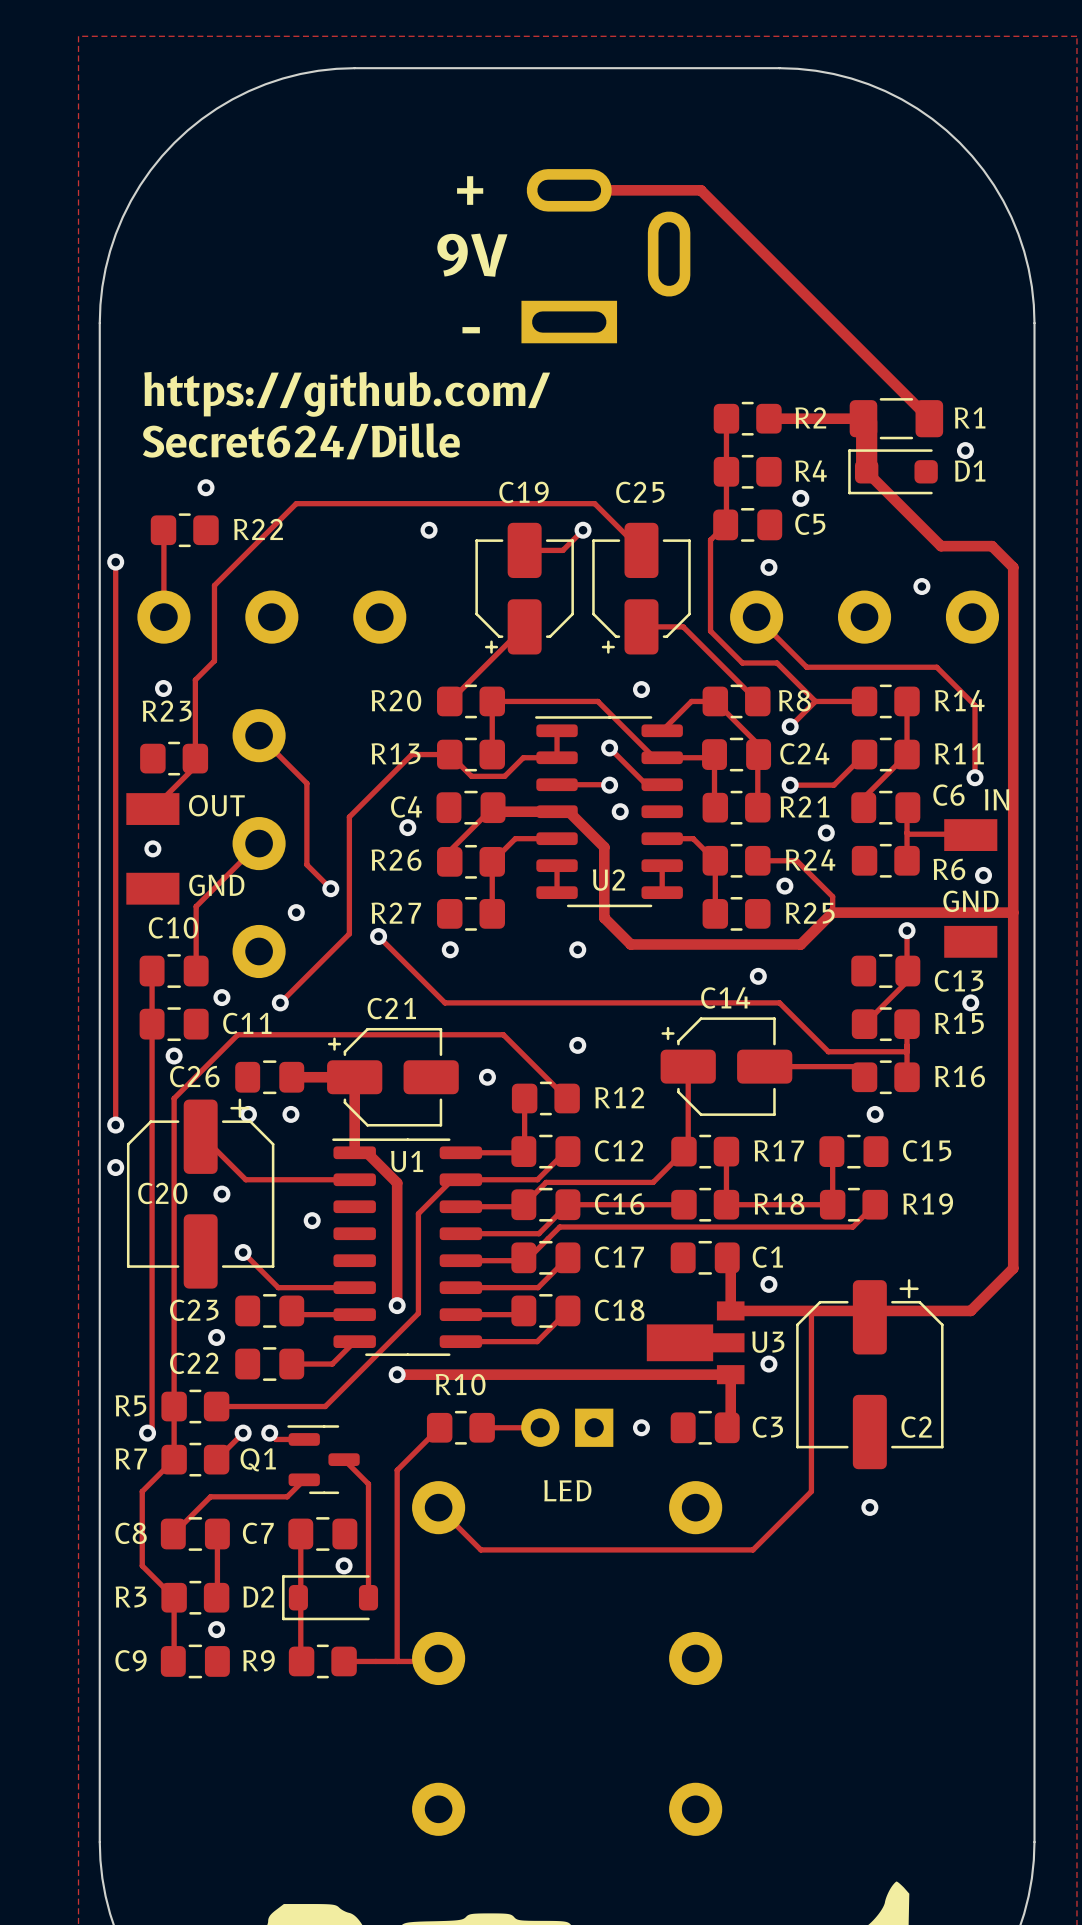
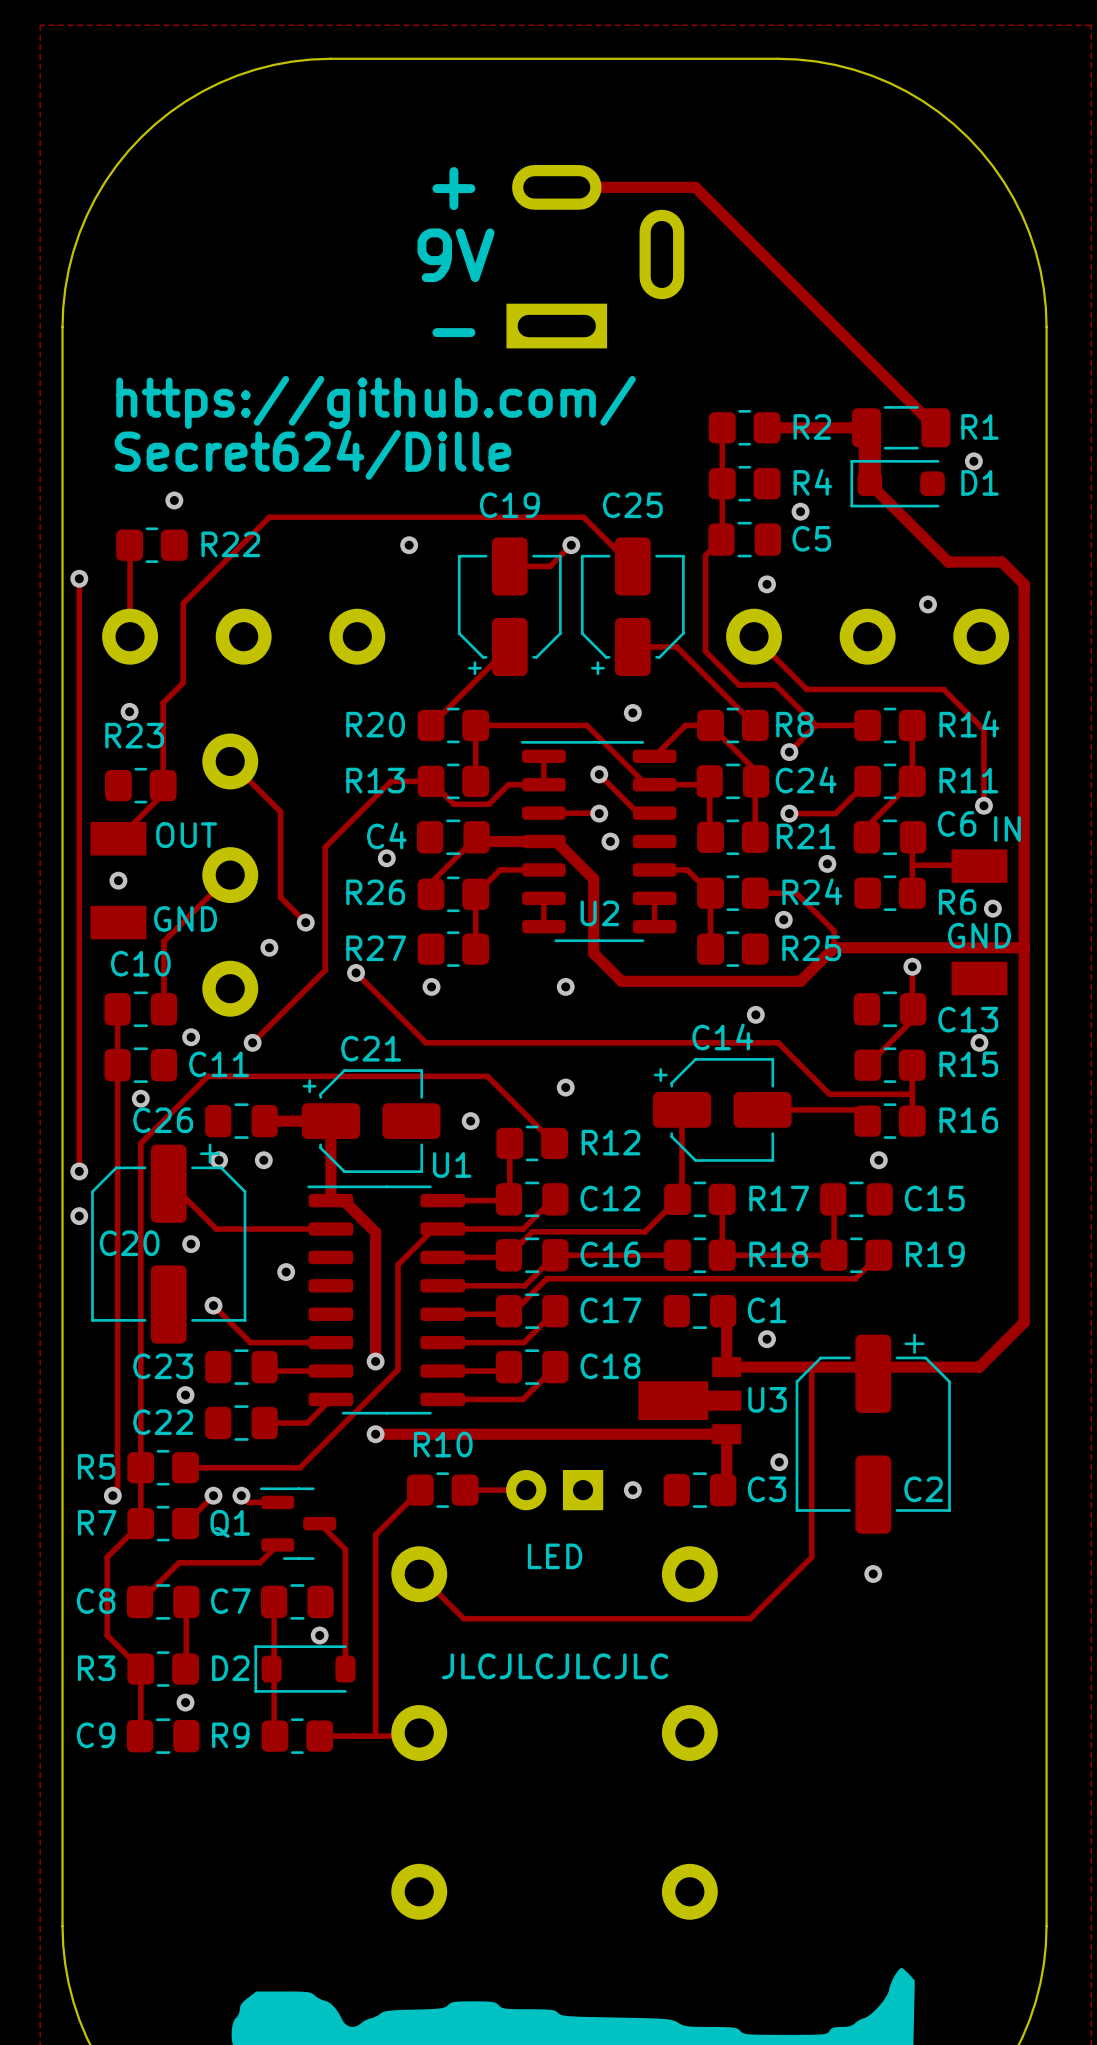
U1 name position: U1 (407, 1161) -> U1 (452, 1165)
via position: (768, 1364) -> (779, 1462)
text: none -> JLCJLCJLCJLC (555, 1666)

